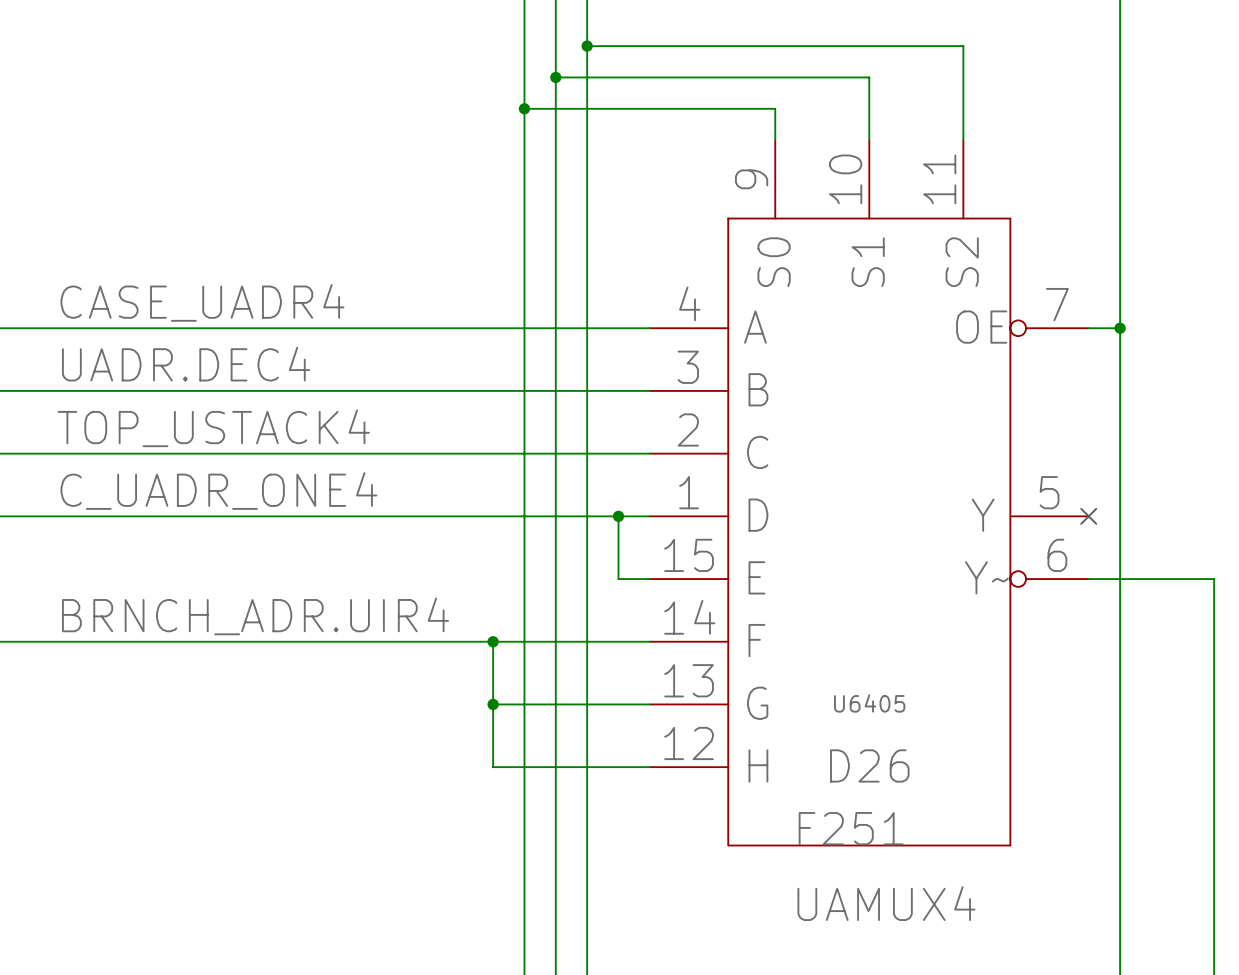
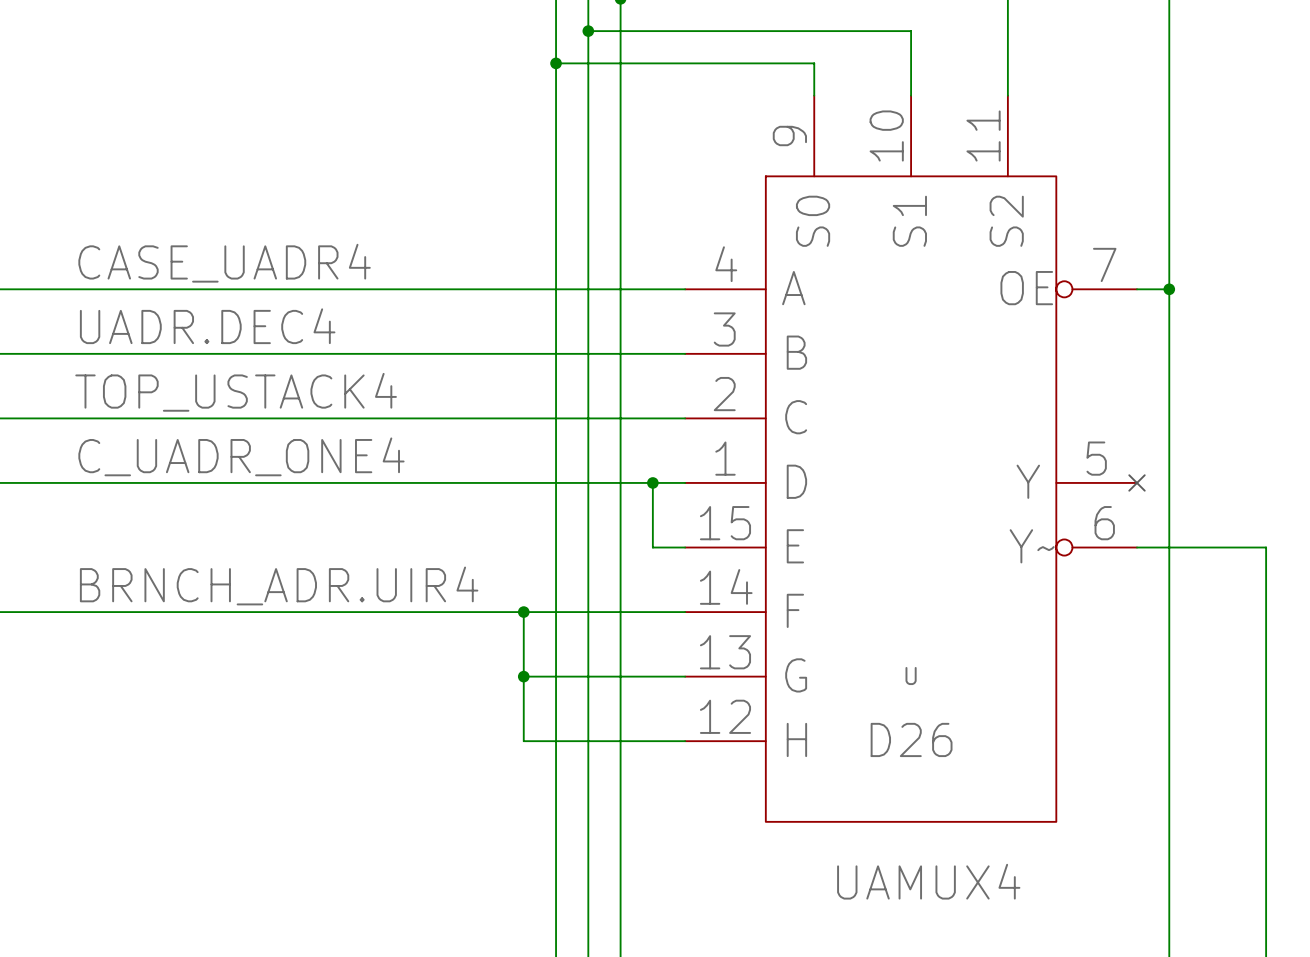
U6405 name: U6405 (869, 703) -> U (911, 676)
U6405 value: F251 (851, 828) -> none

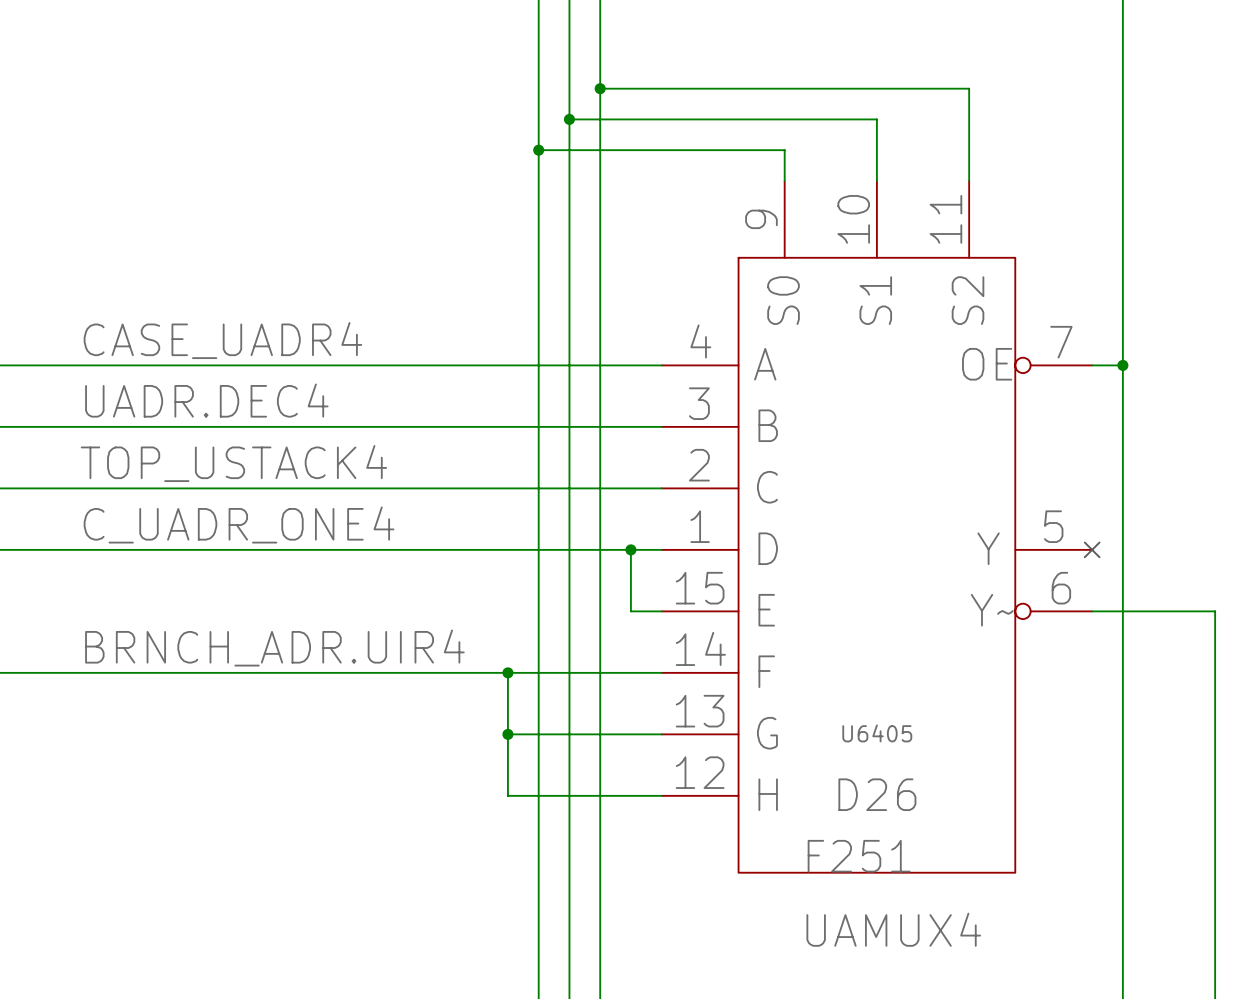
U name: U (911, 676) -> U6405 (877, 733)
U value: none -> F251 (859, 856)

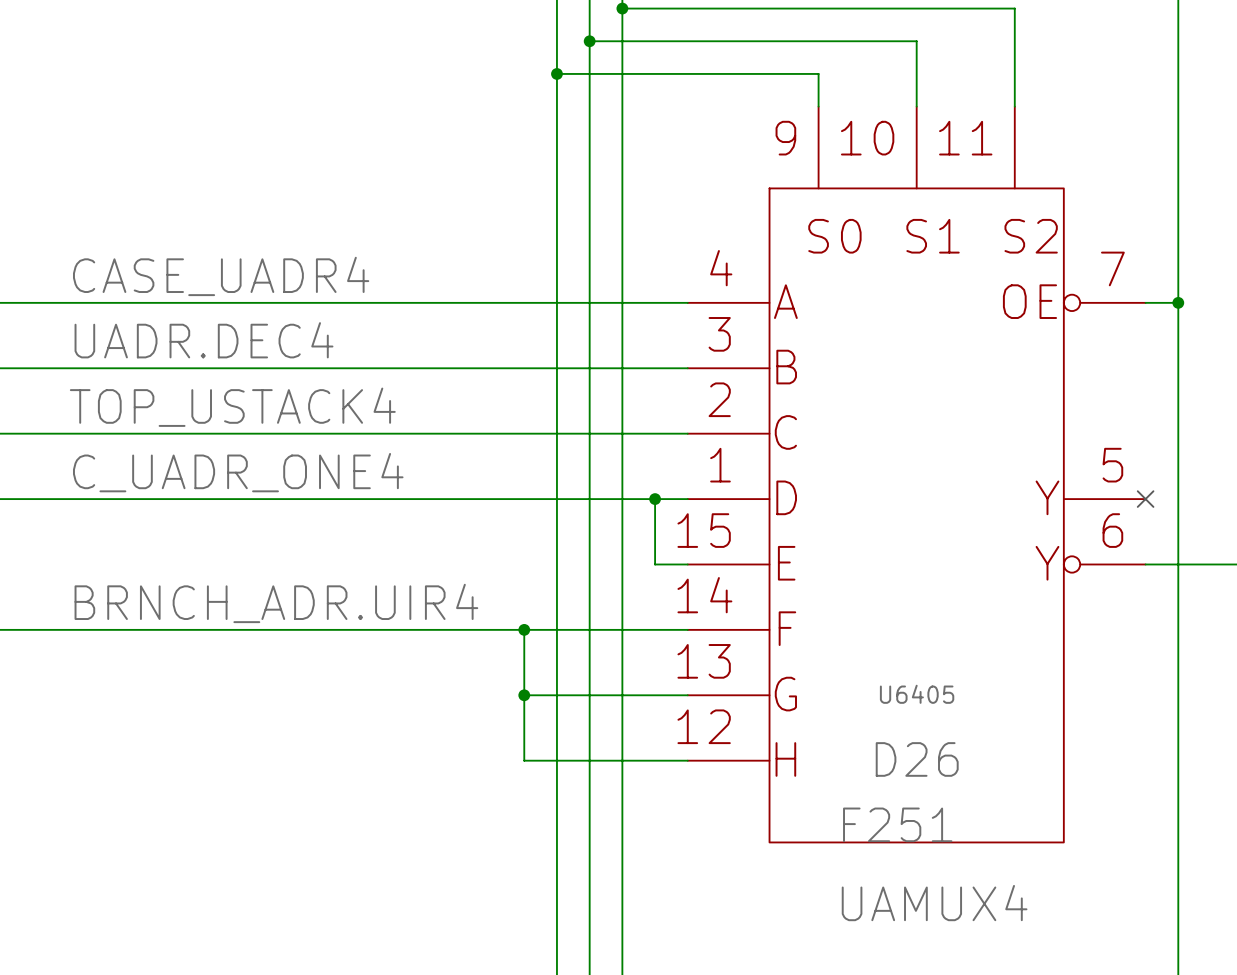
U6405 symbol: [661, 180, 1093, 873] -> [687, 106, 1146, 843]

